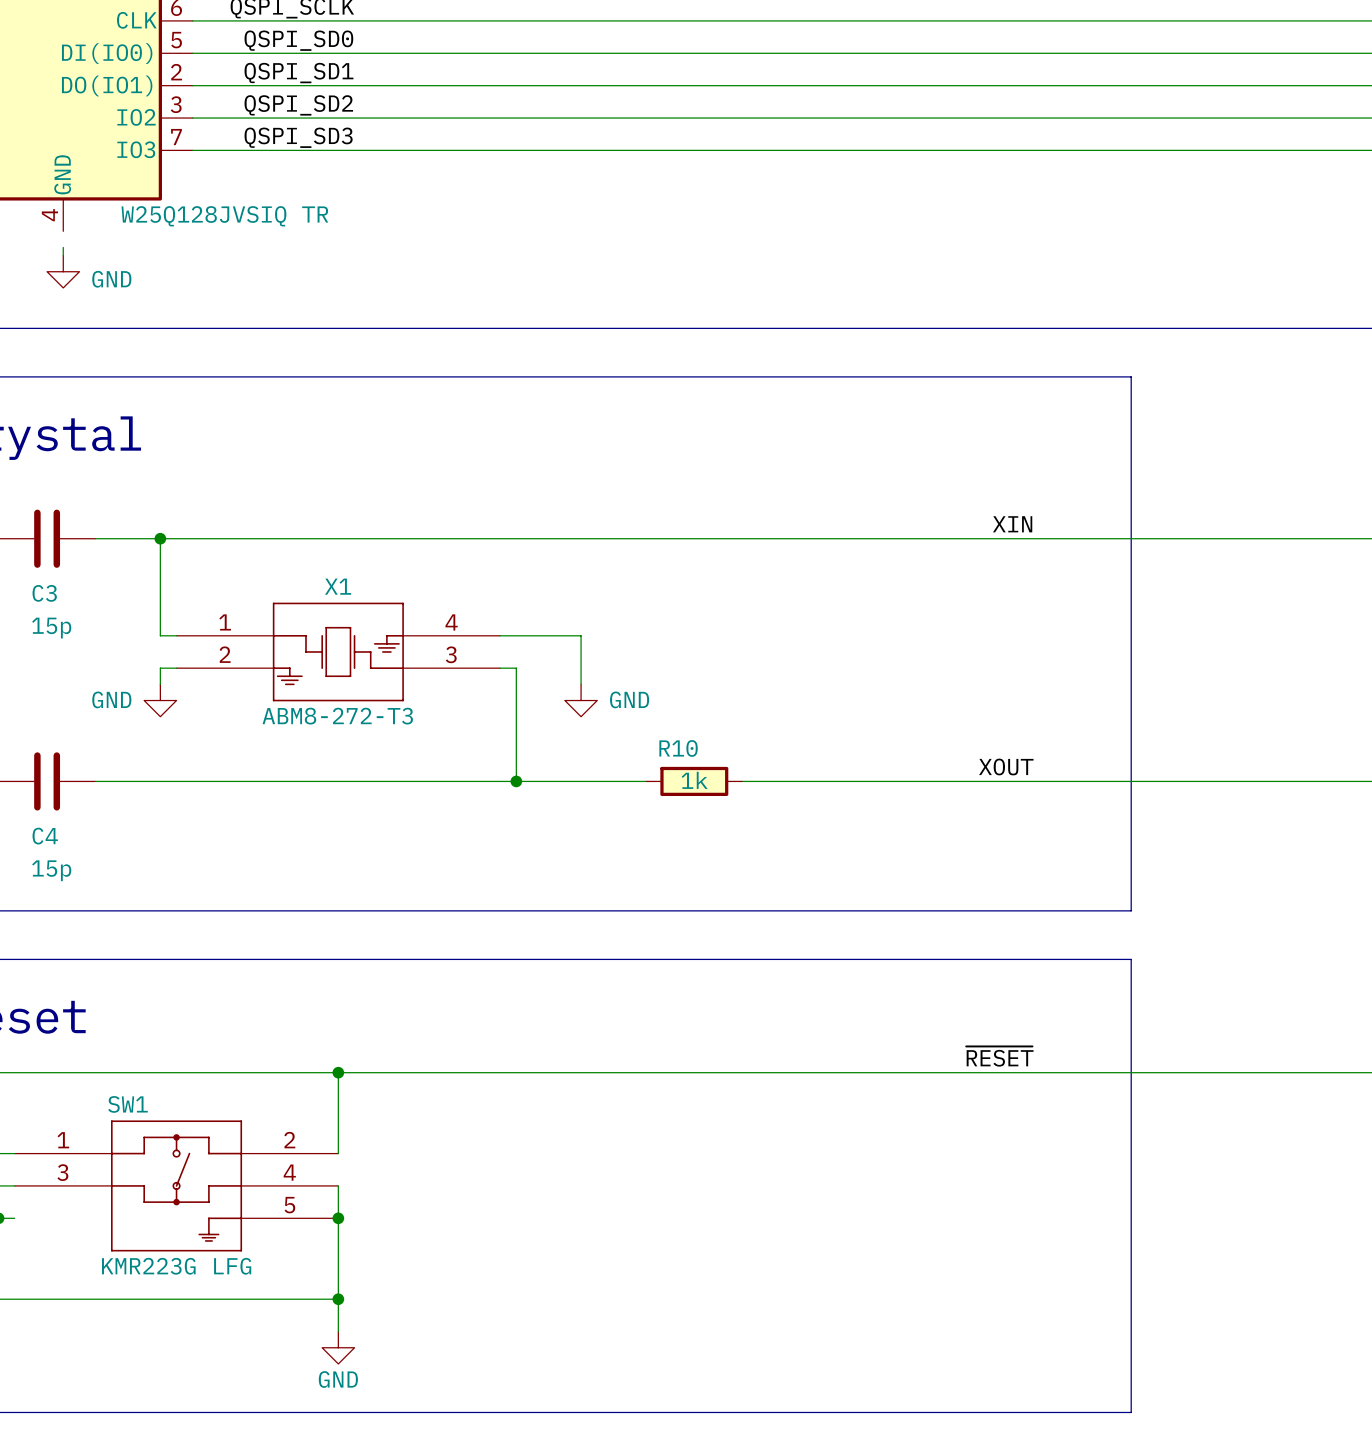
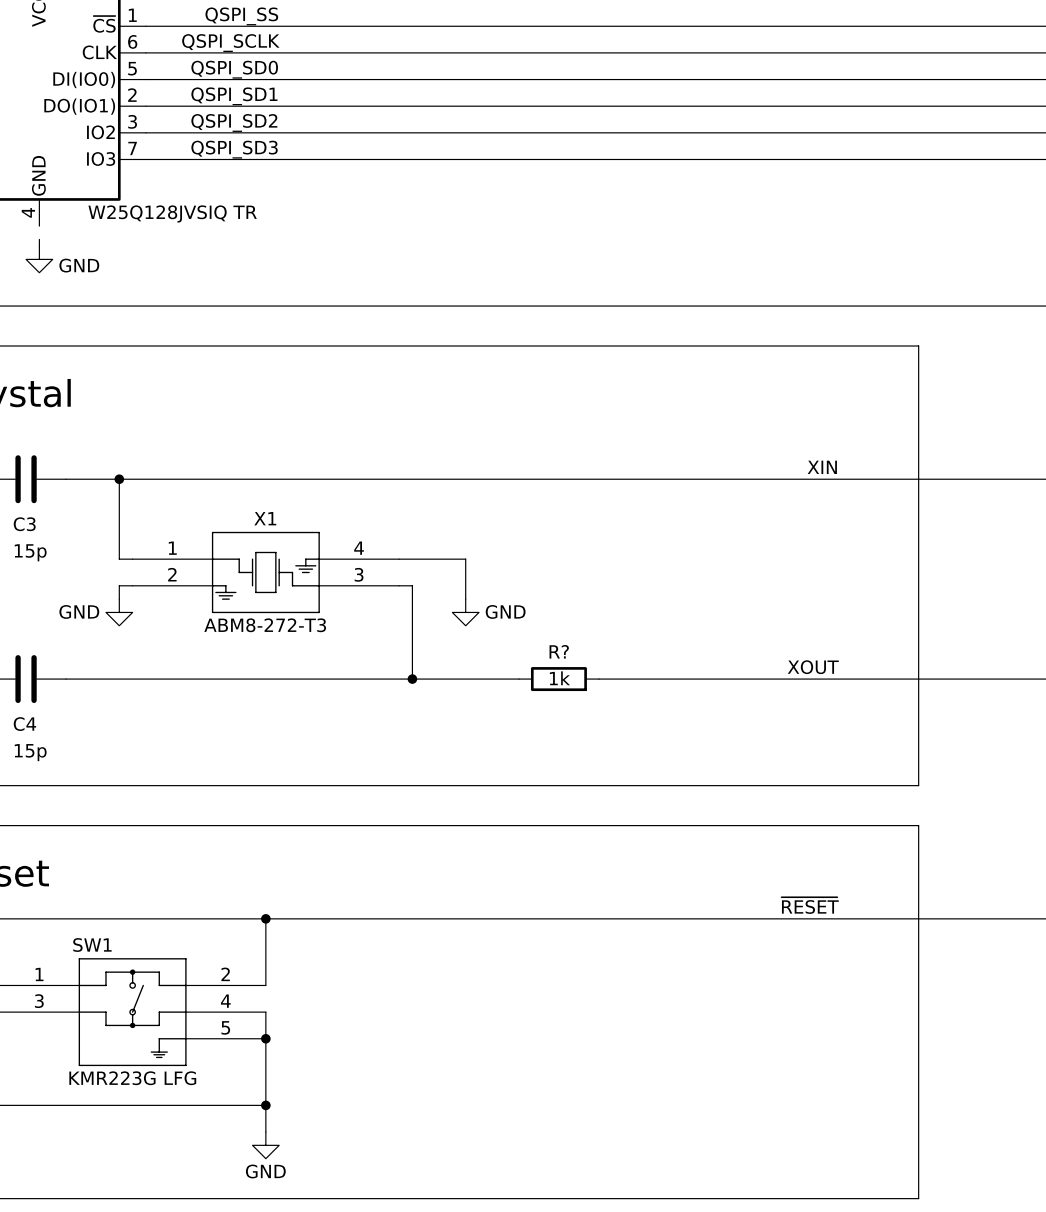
R10: 1k (694, 781) -> none
R?: none -> 1k (558, 679)

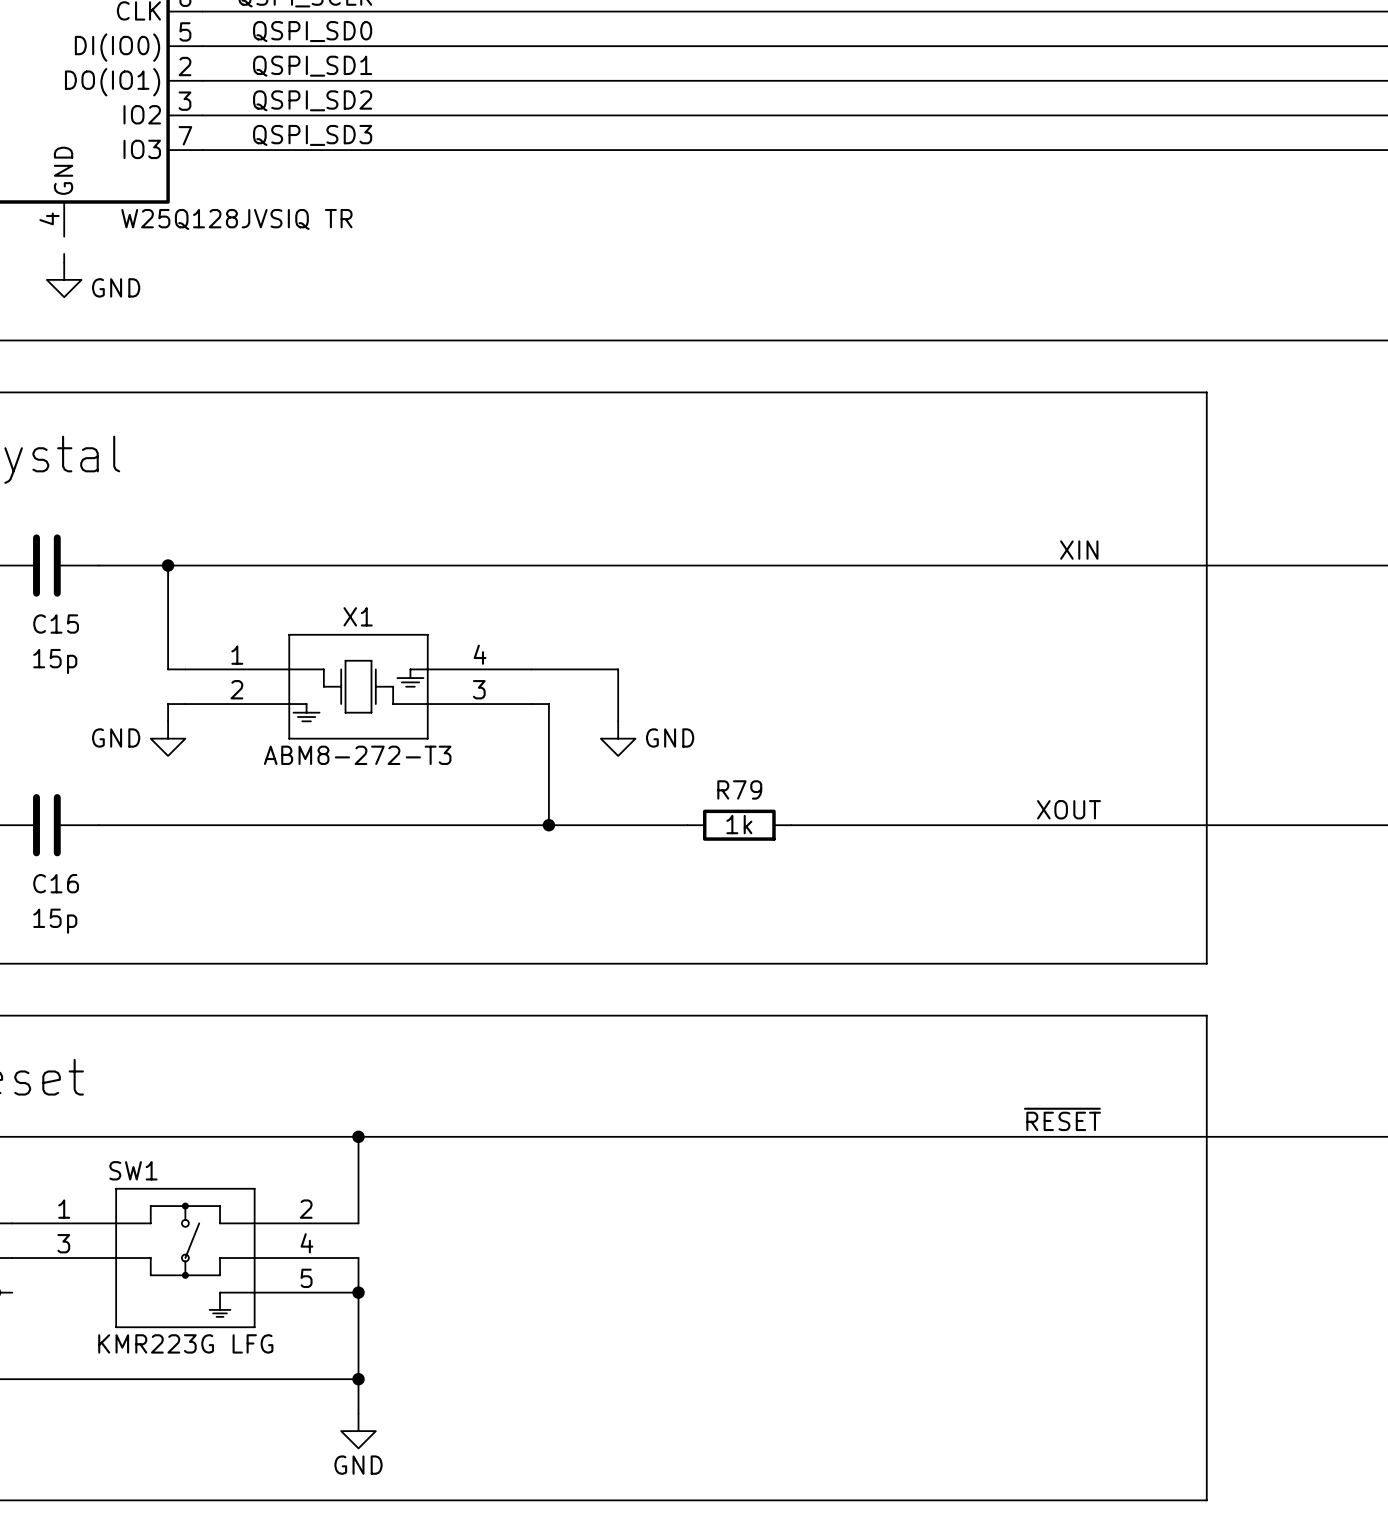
C3 name: C3 (24, 524) -> C15 (56, 624)
R? name: R? (559, 651) -> R79 (739, 789)
C4 name: C4 (24, 724) -> C16 (56, 883)

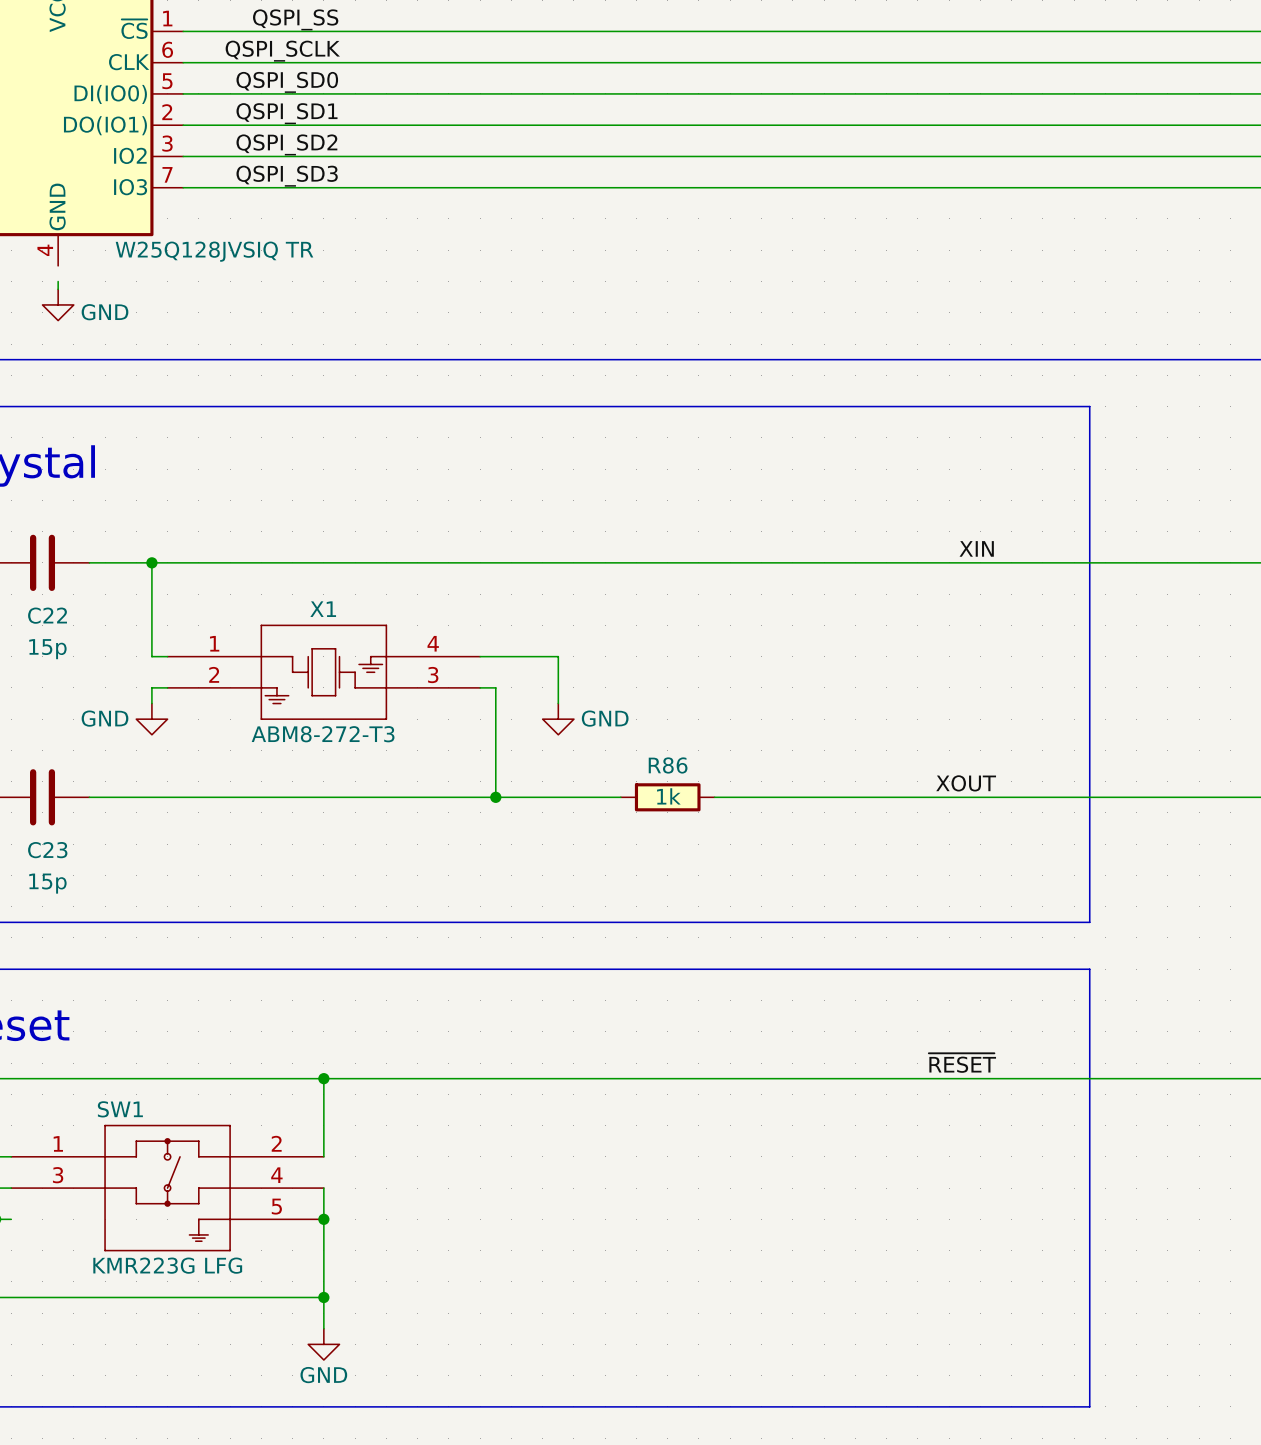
C15 name: C15 (56, 624) -> C22 (47, 615)
R79: 1k (739, 825) -> none
R86: none -> 1k (667, 797)
C16 name: C16 (56, 883) -> C23 (47, 850)

